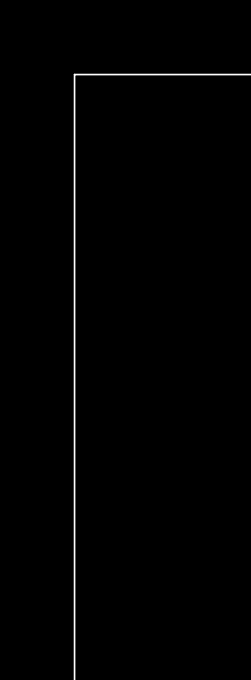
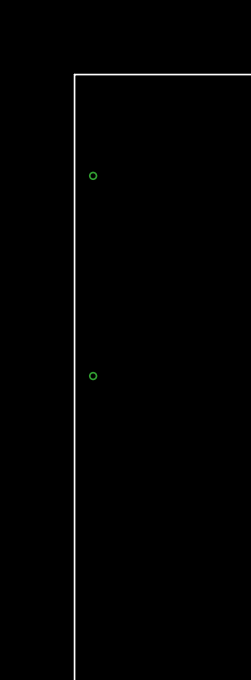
via: none -> (93, 175)
via: none -> (93, 376)

